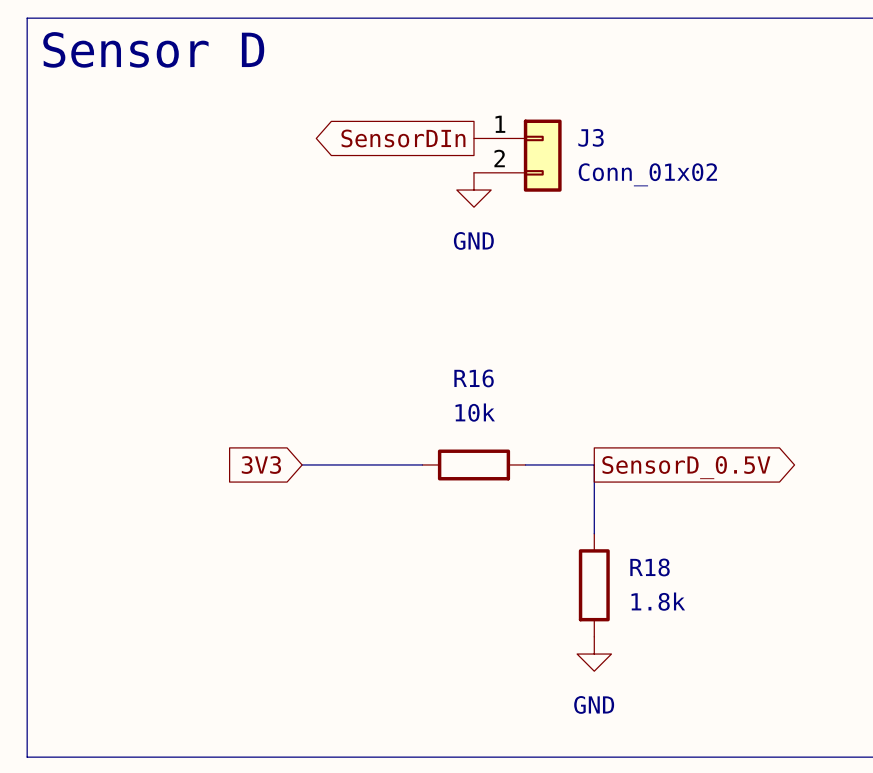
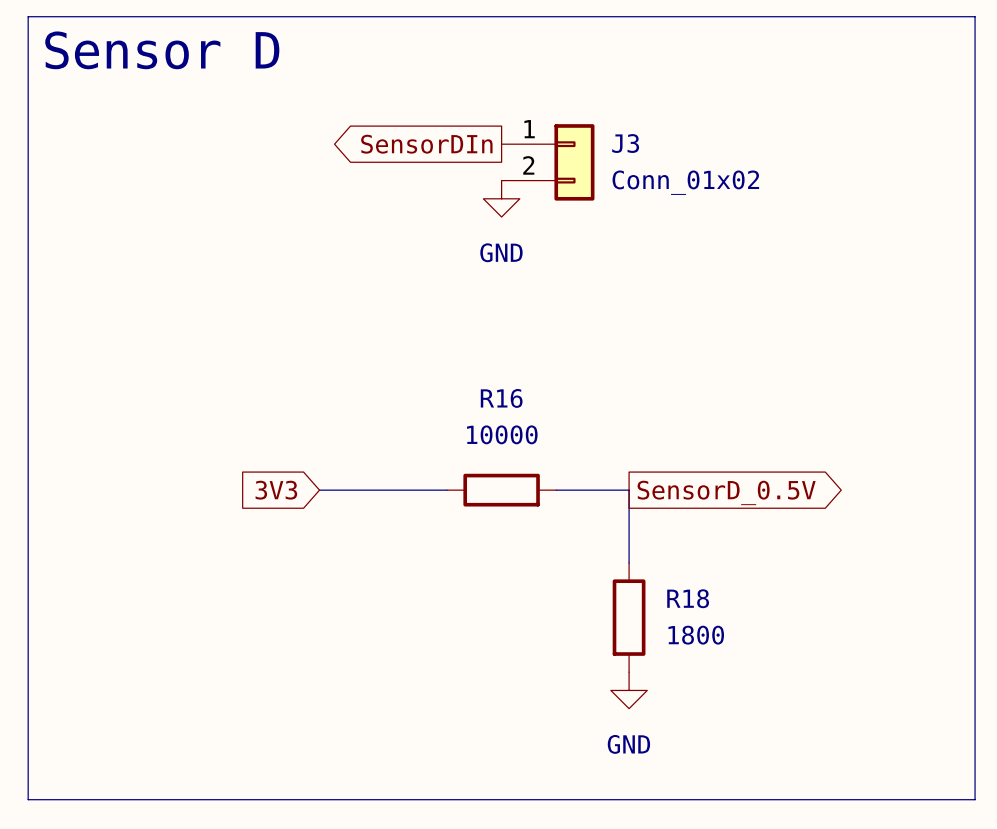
R16 value: 10k (475, 412) -> 10000 (502, 434)
R18 value: 1.8k (658, 601) -> 1800 (696, 635)

